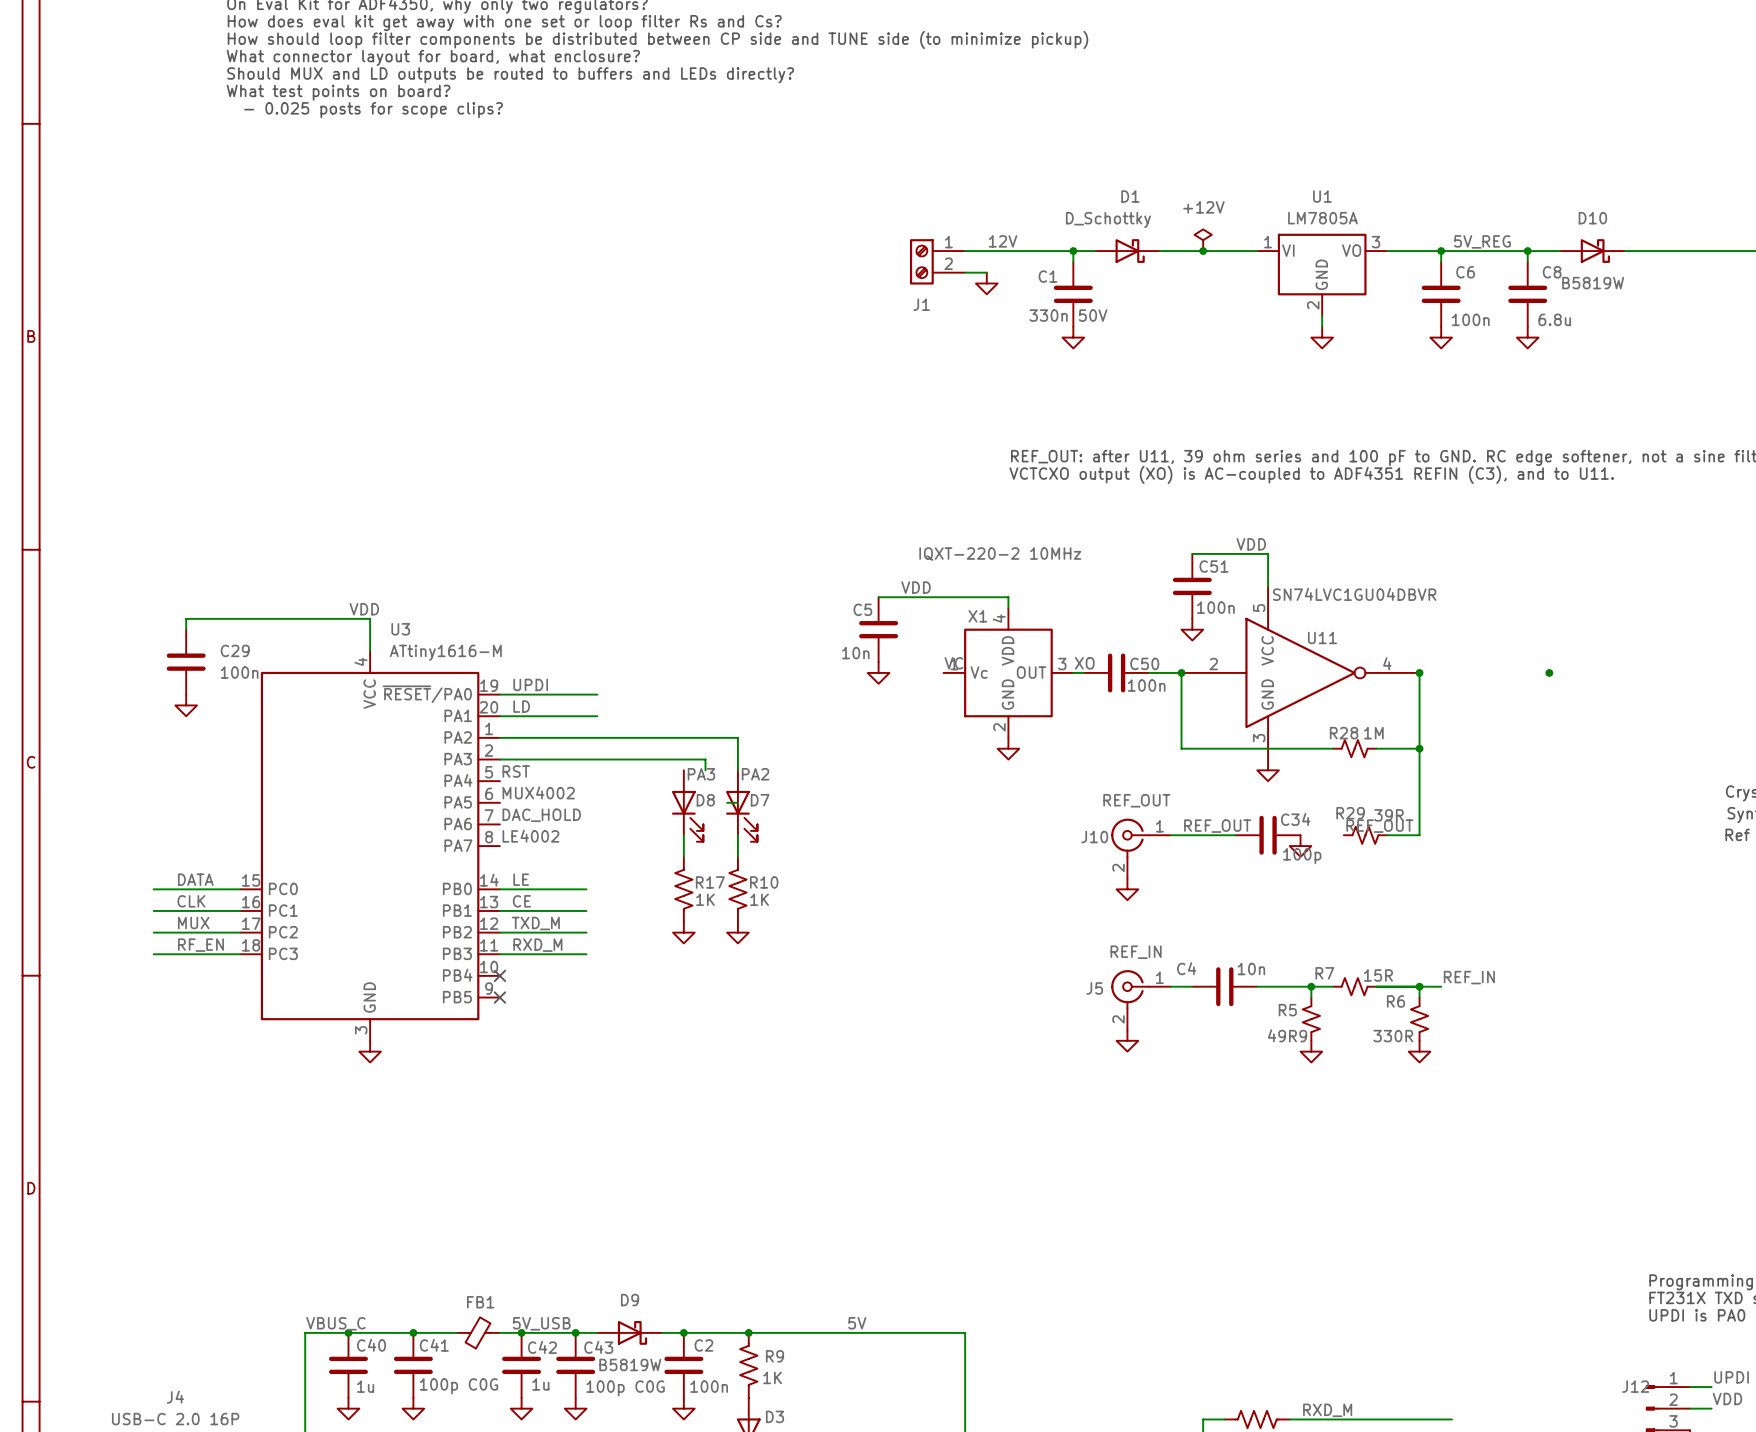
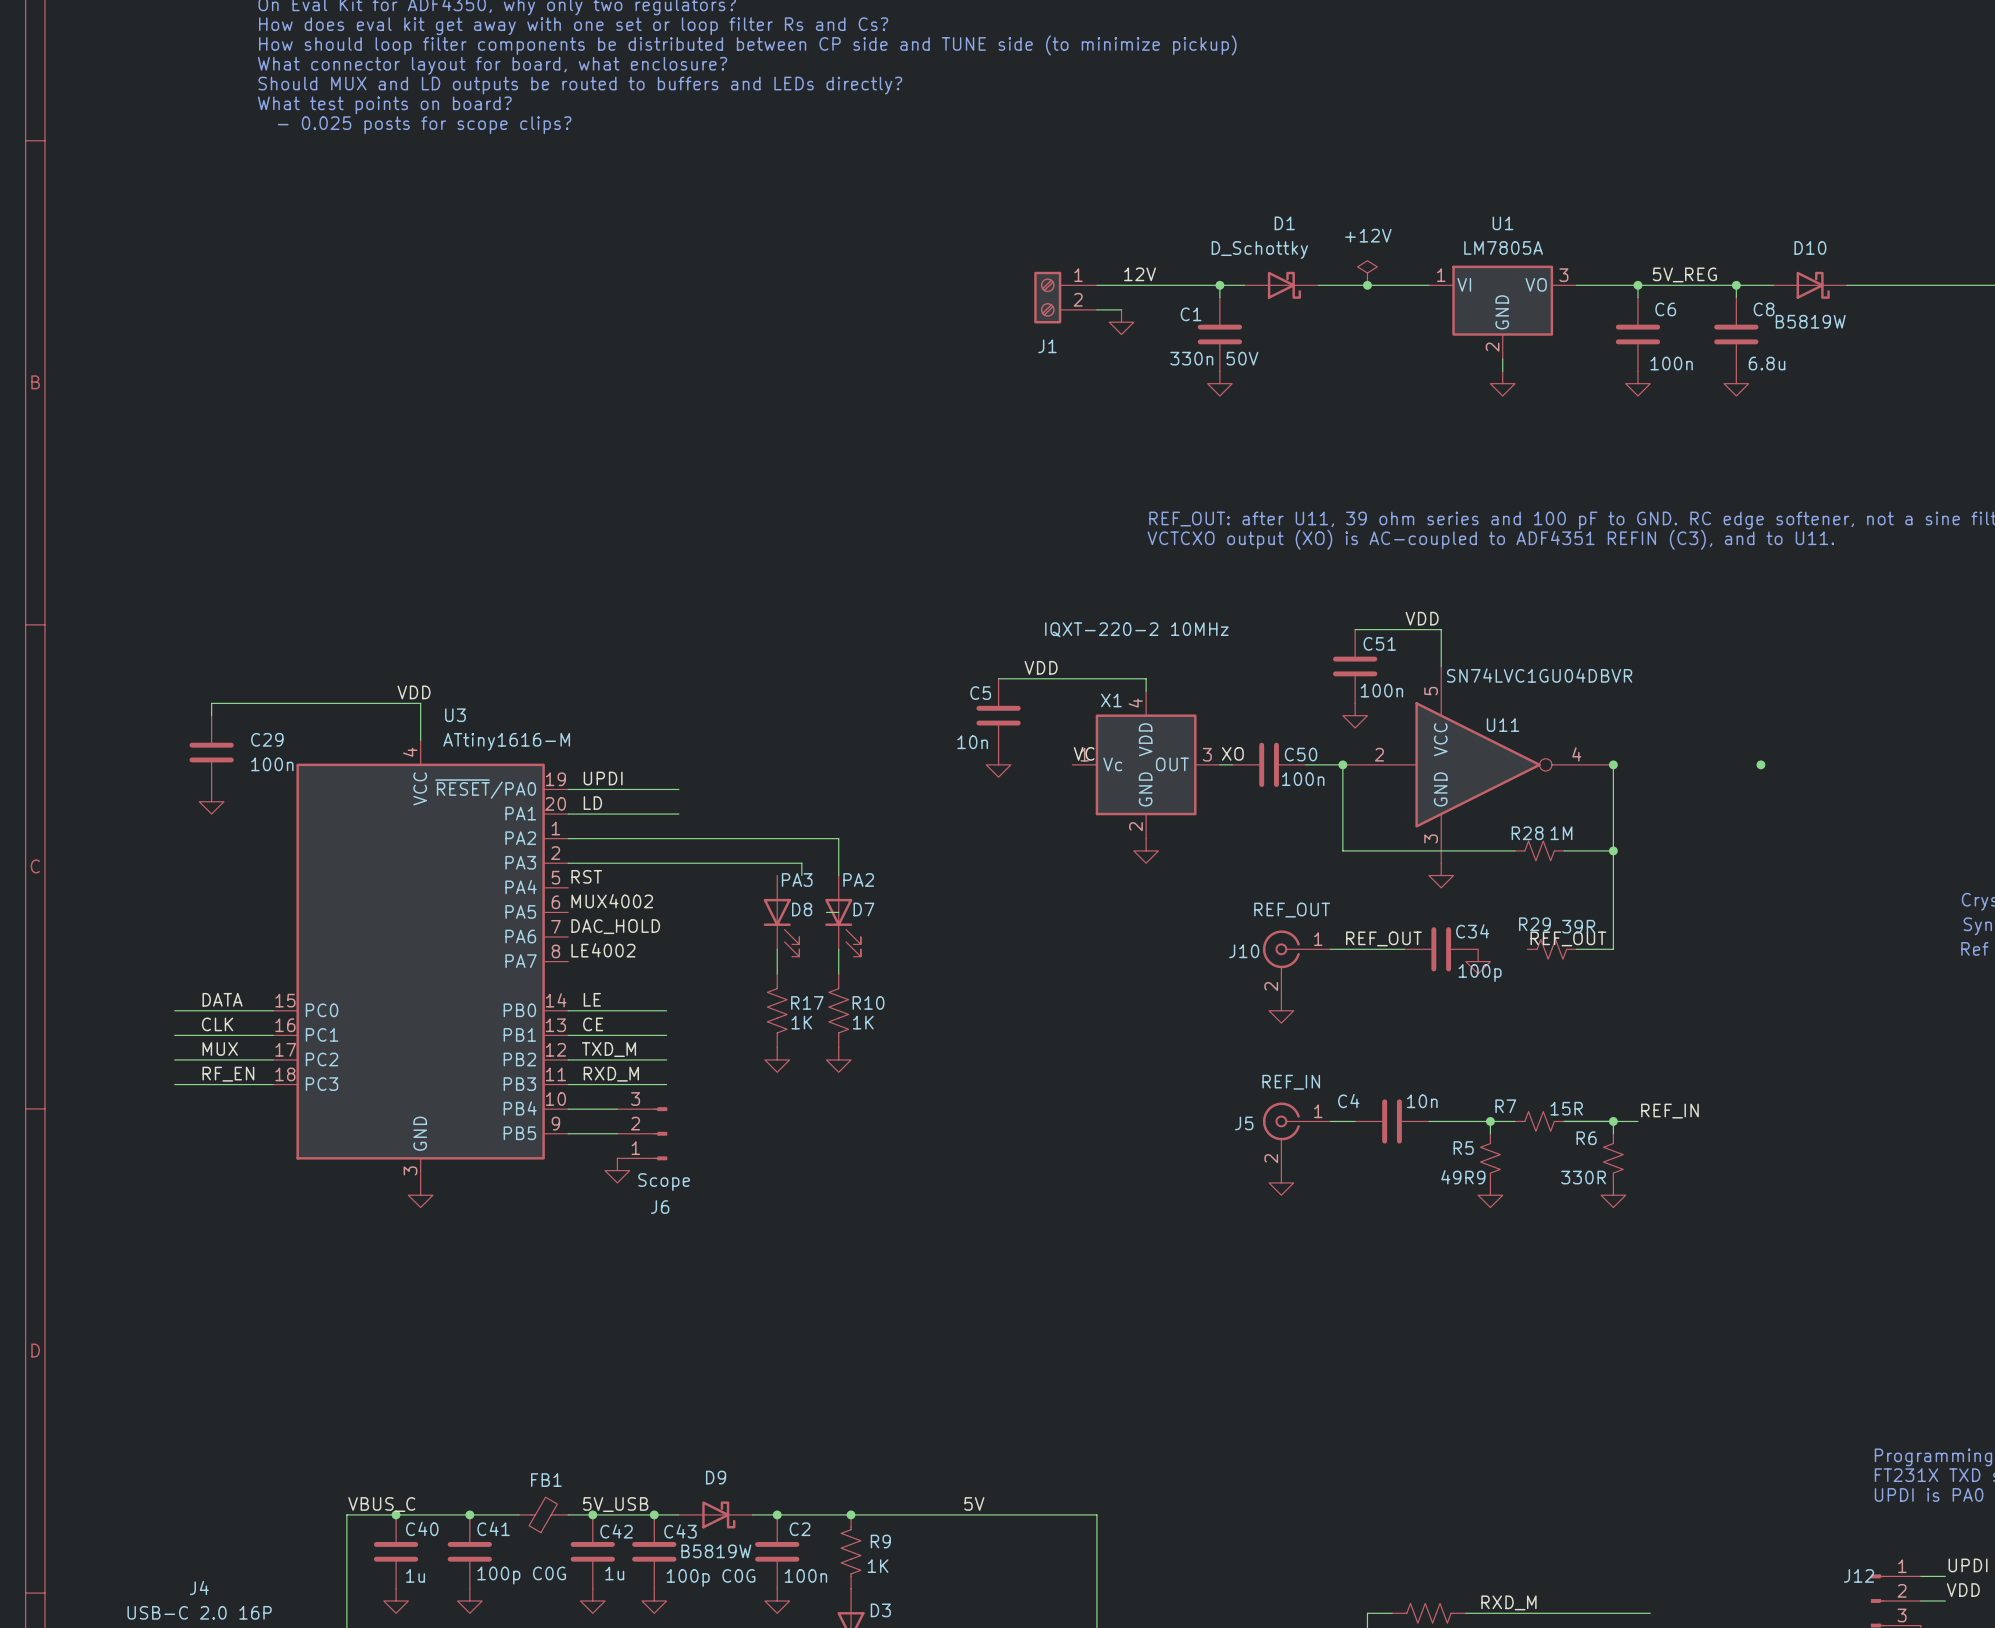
wire: none -> (568, 1109) (617, 1109)
no-connect mark: (499, 975) -> none
wire: none -> (568, 1133) (617, 1133)
no-connect mark: (499, 997) -> none
J6: none -> Scope (642, 1133)
power symbol: none -> (617, 1170)

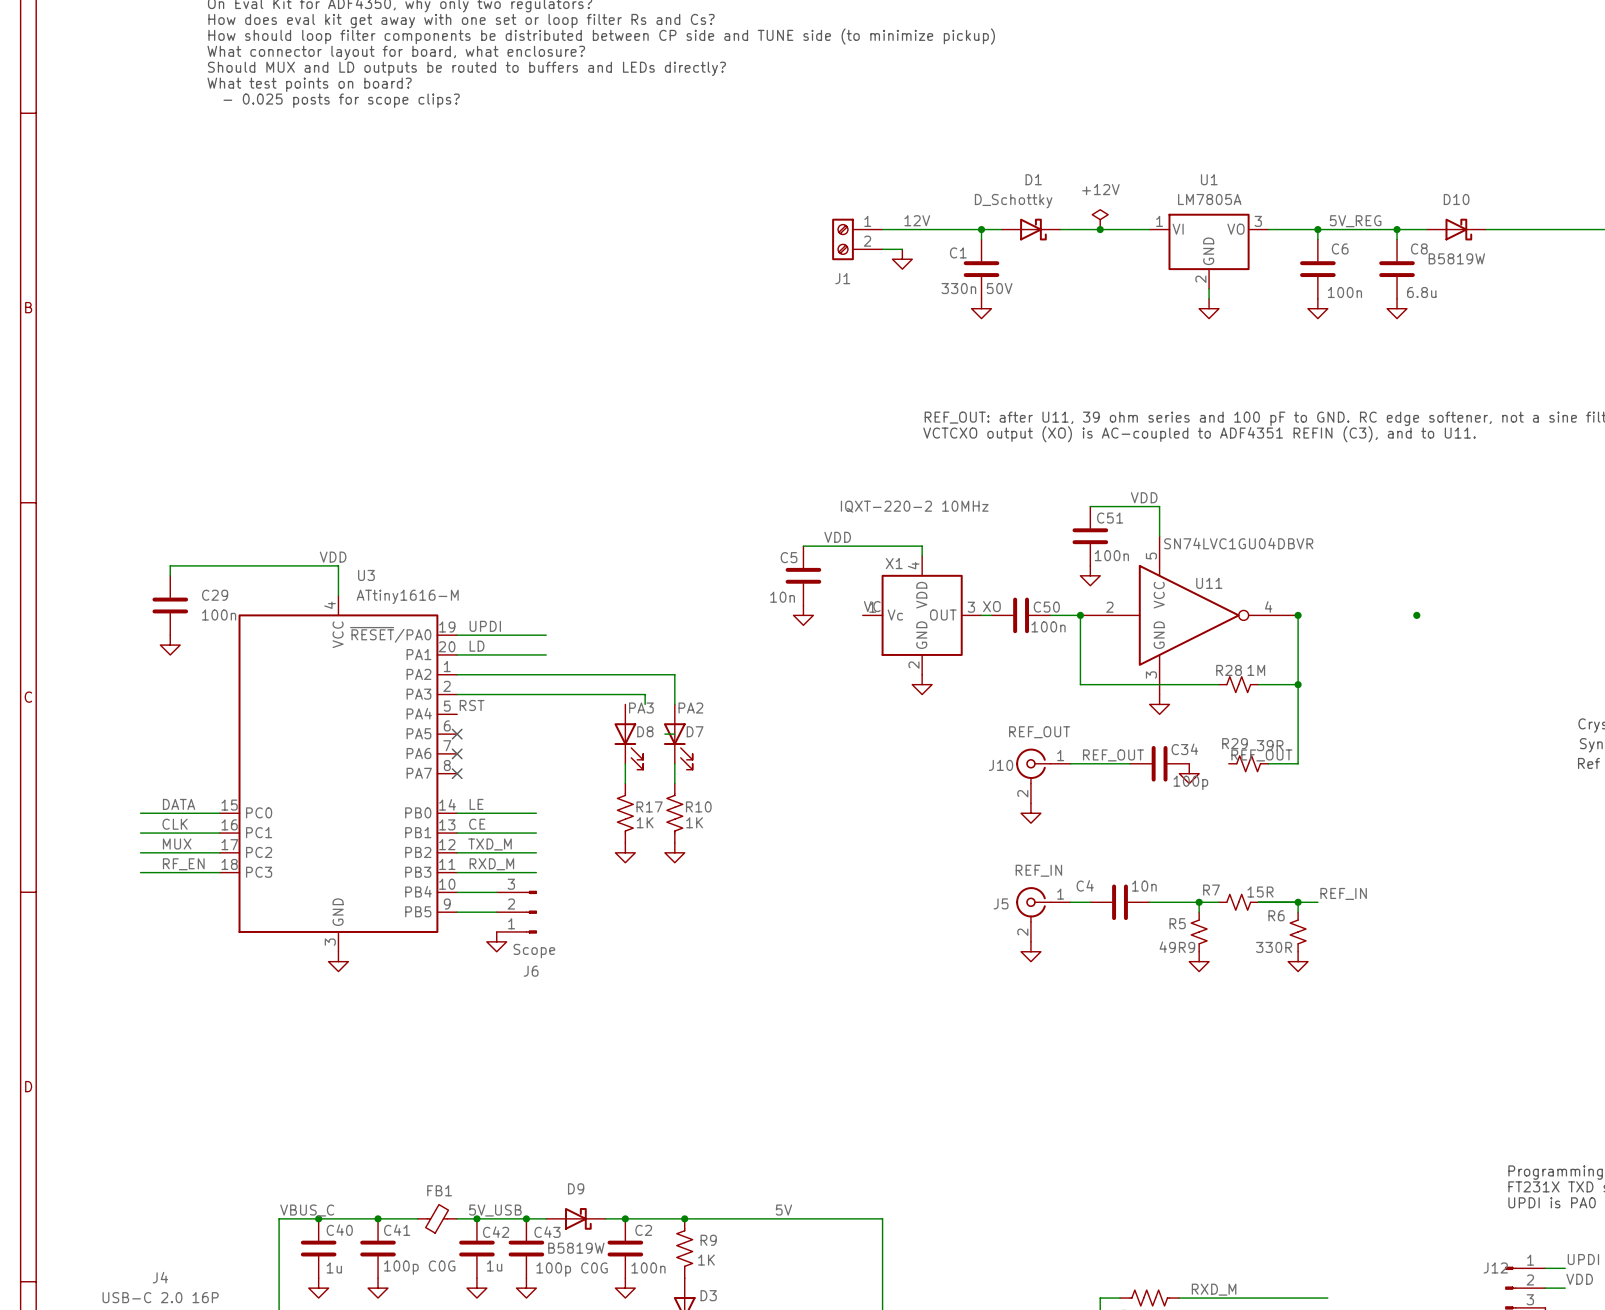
label: MUX4002 (612, 901) -> none
no-connect mark: none -> (457, 734)
label: DAC_HOLD (615, 926) -> none
no-connect mark: none -> (457, 753)
label: LE4002 (603, 950) -> none
no-connect mark: none -> (457, 773)

